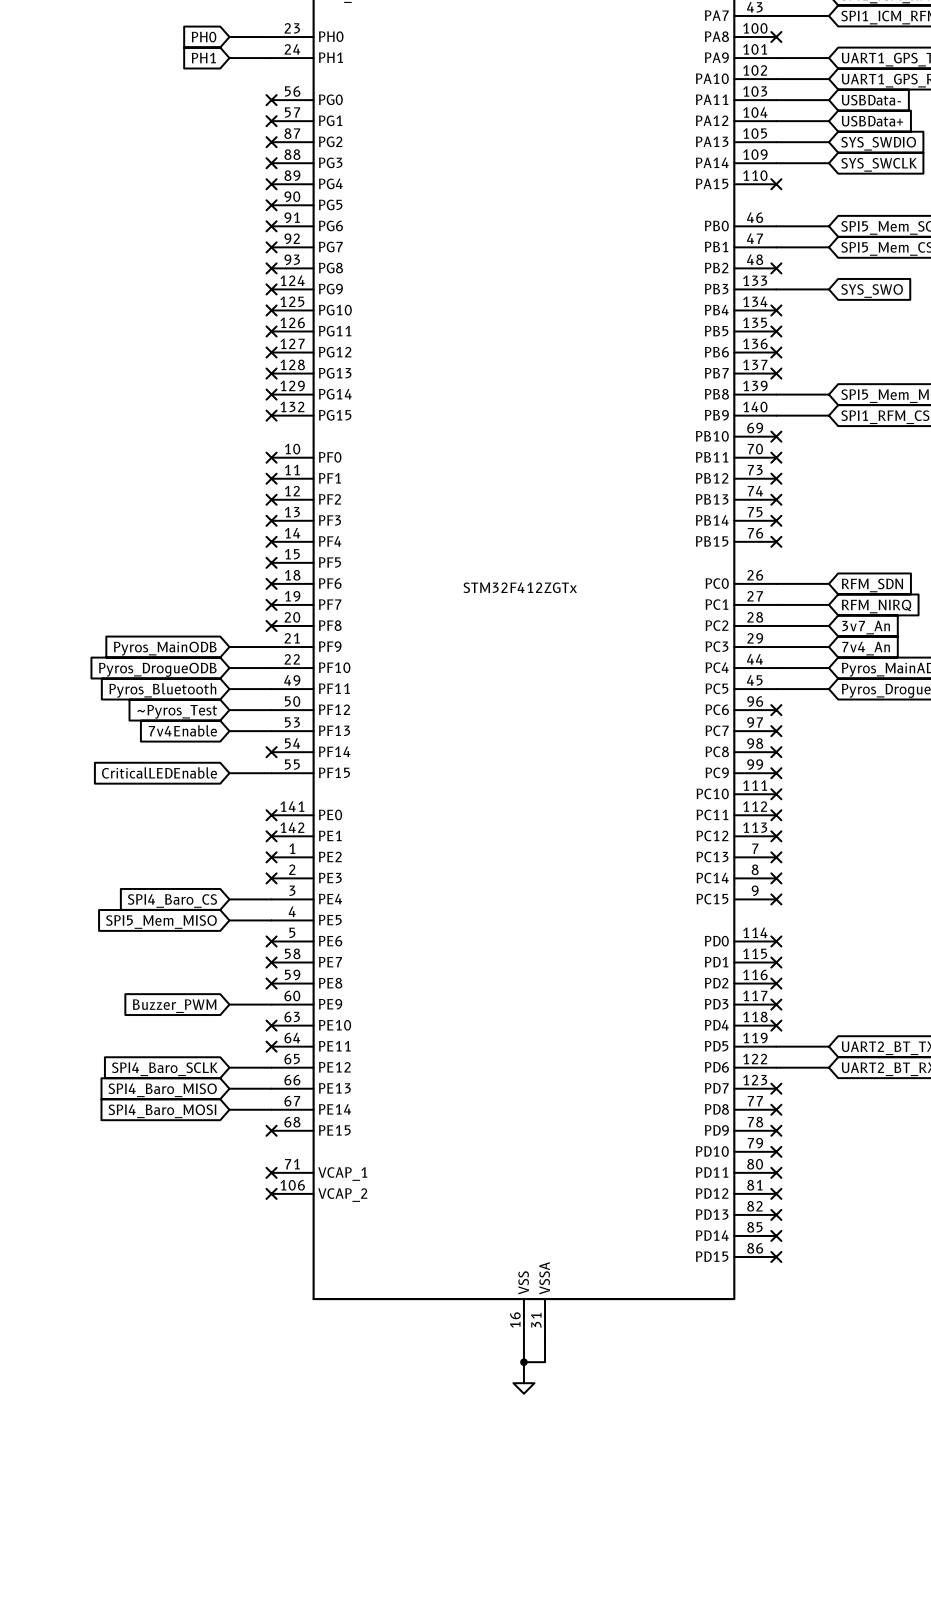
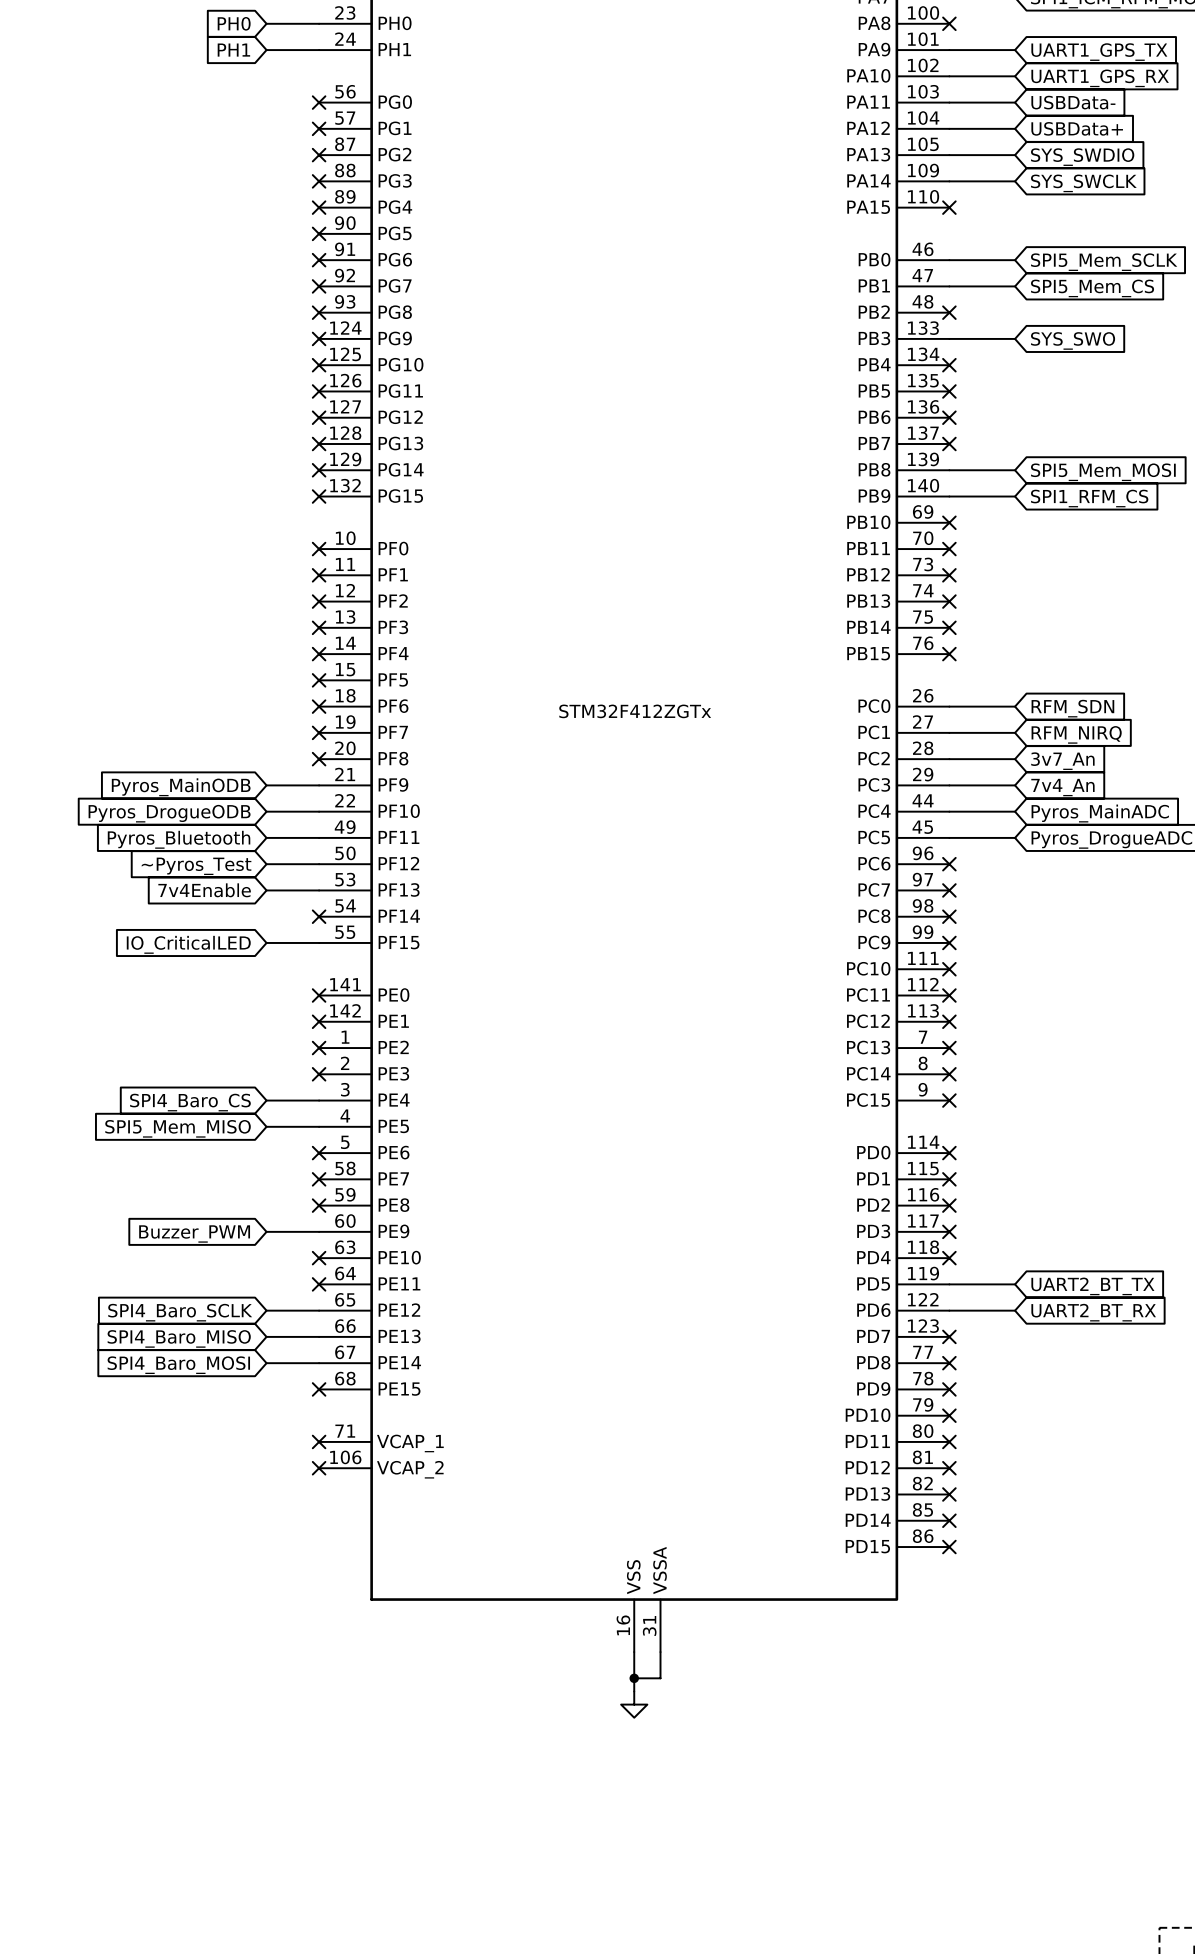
global label: CriticalLEDEnable (159, 772) -> IO_CriticalLED (188, 944)

